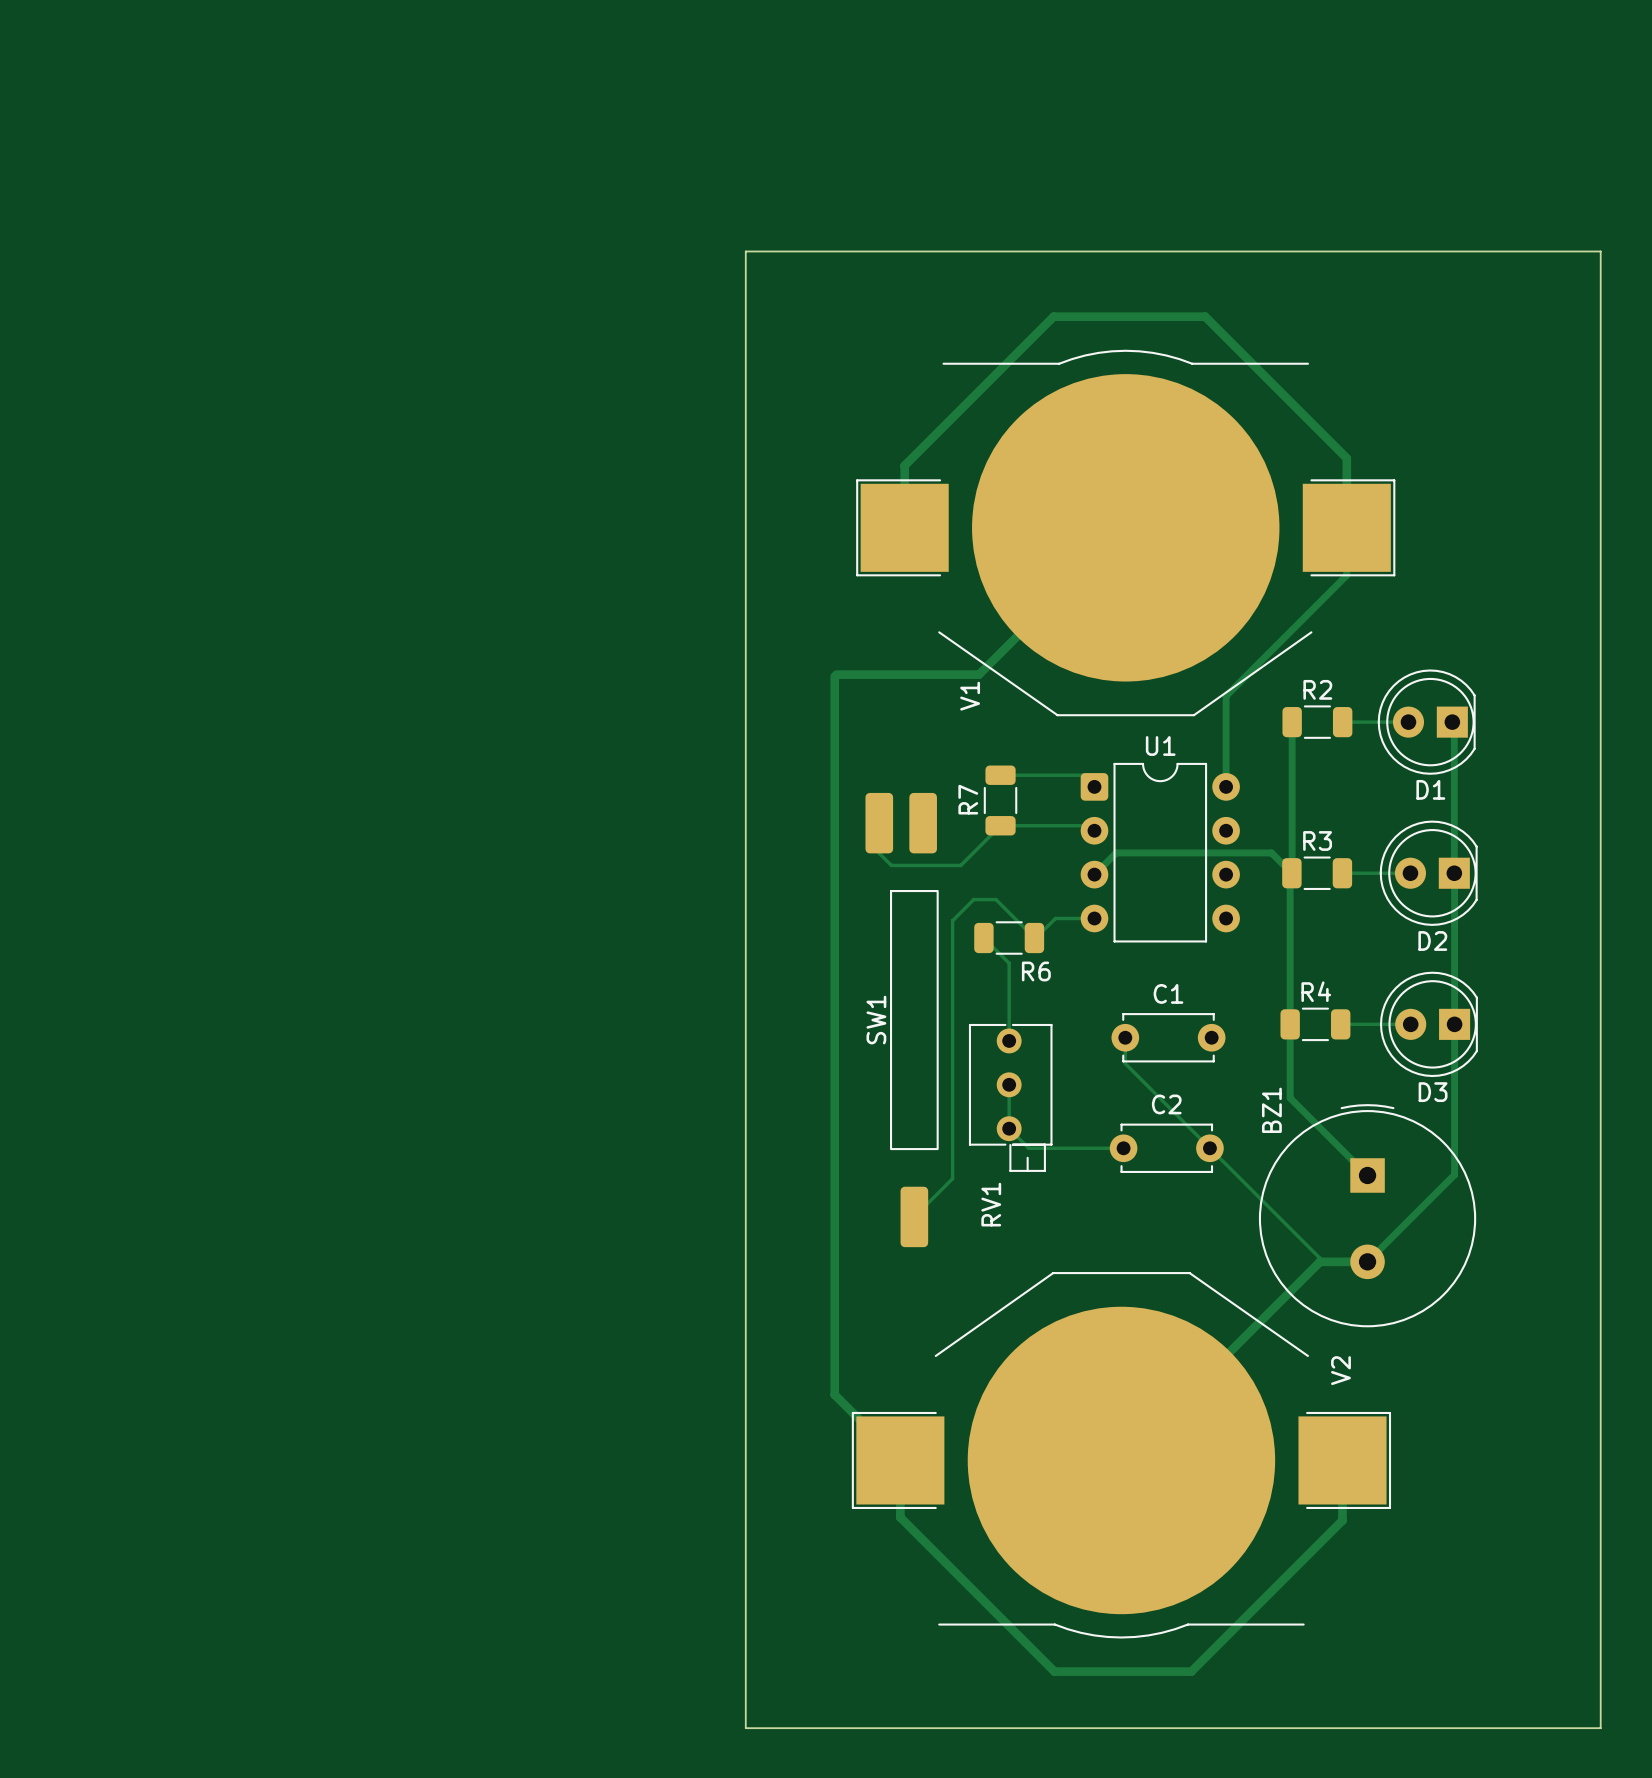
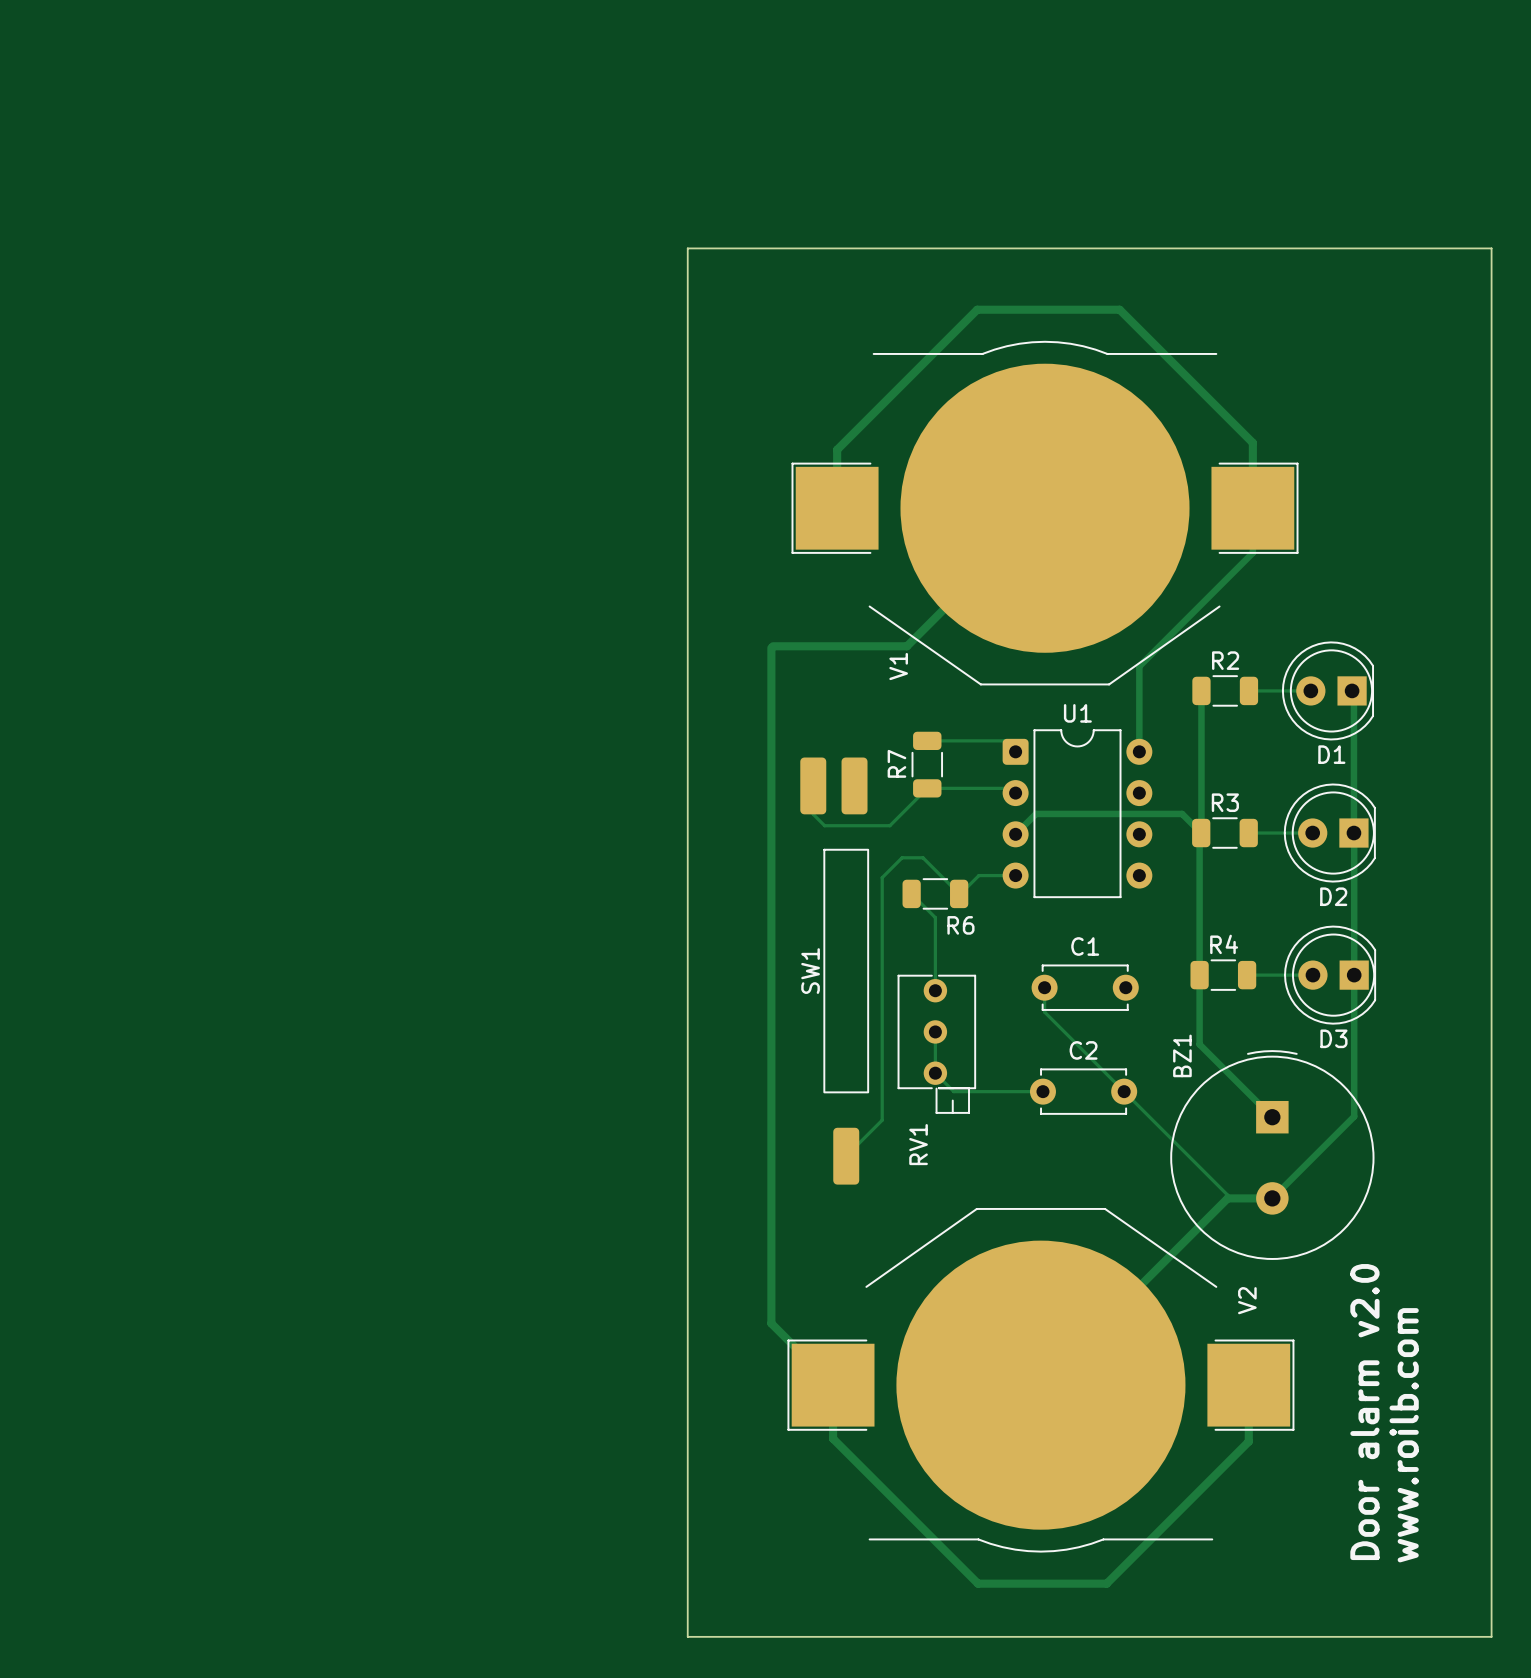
text: none -> Door alarm v2.0 (1364, 1412)
text: none -> www.roilb.com (1404, 1435)

